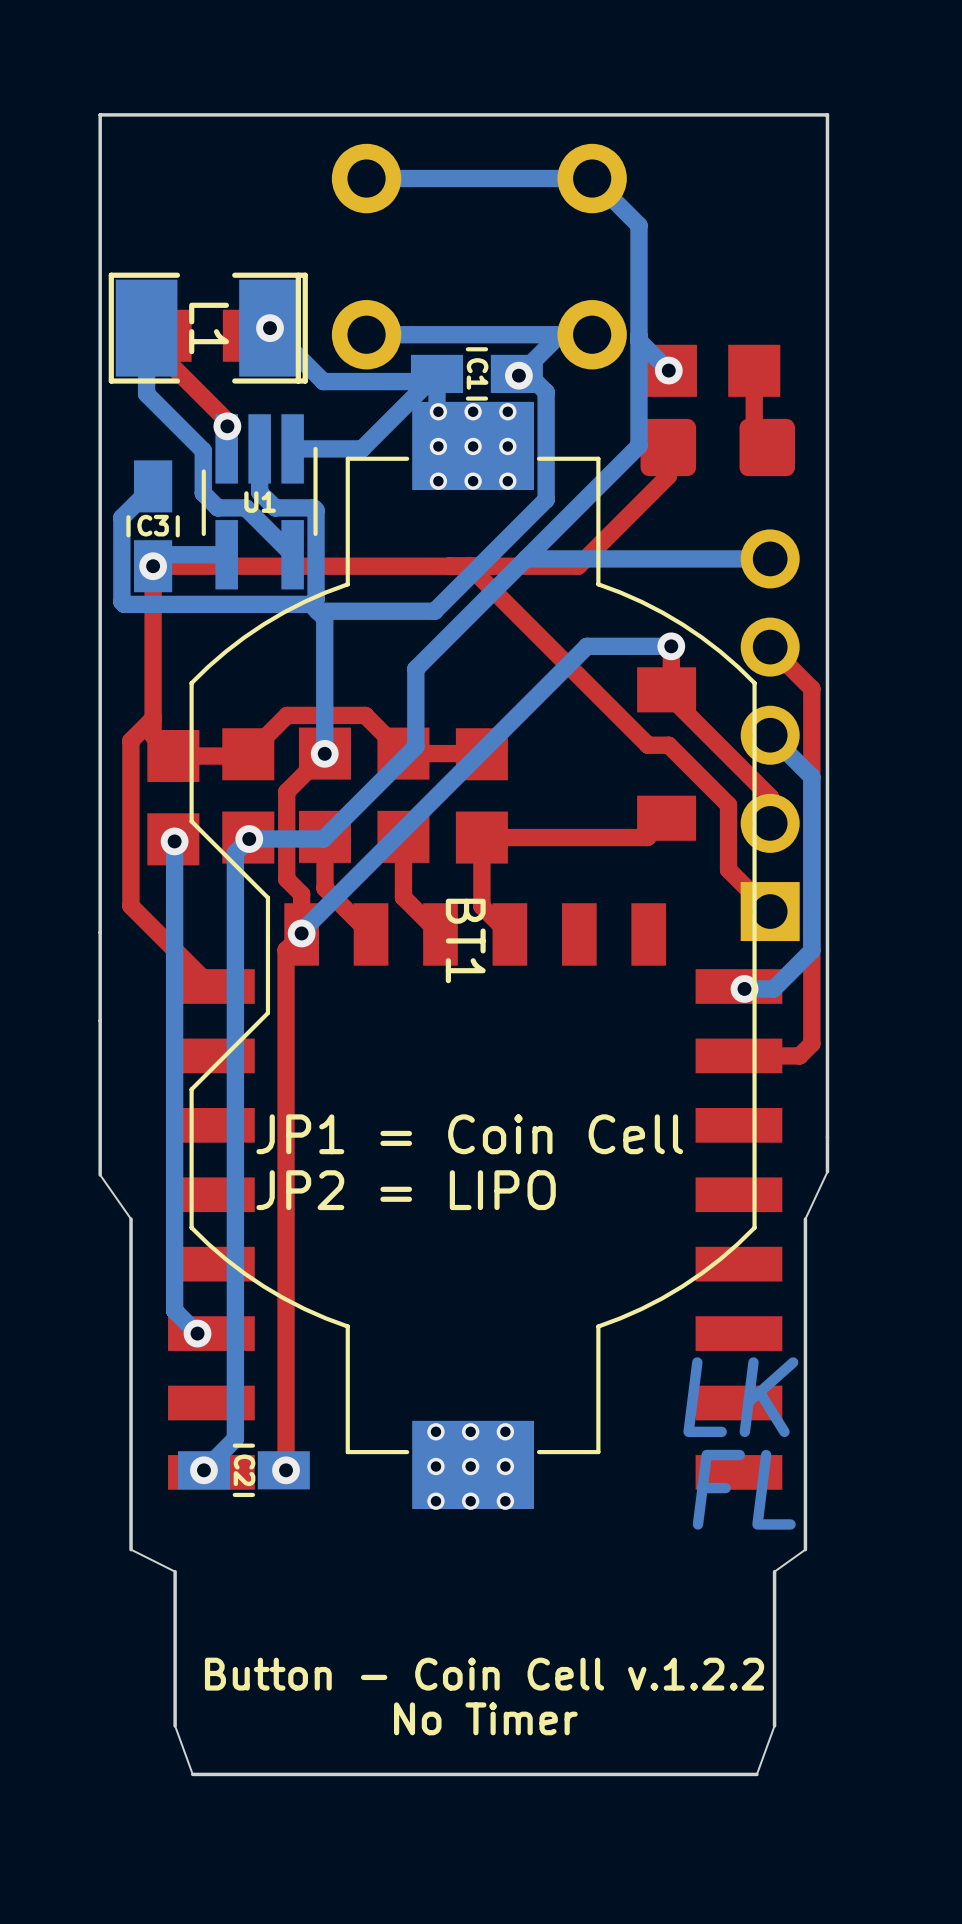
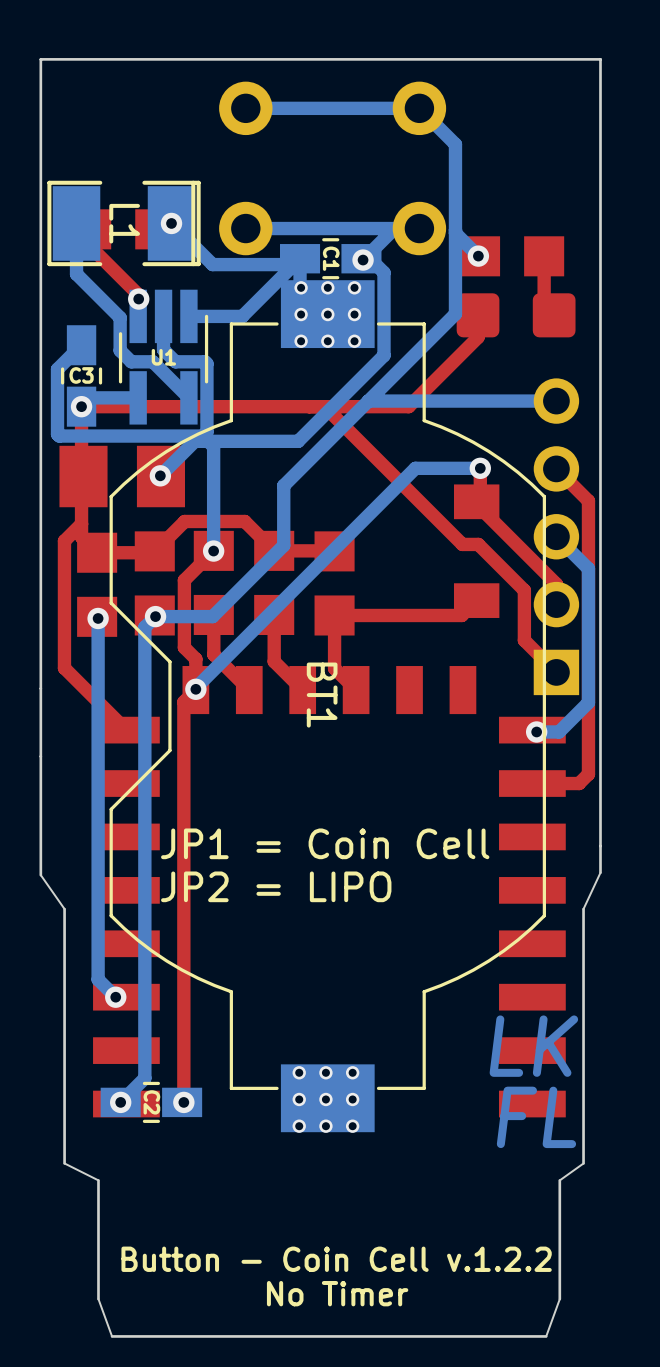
bottom track: none -> (208, 441) (194, 441) (160, 475)
part: none -> (122, 476)
via: none -> (160, 475)

